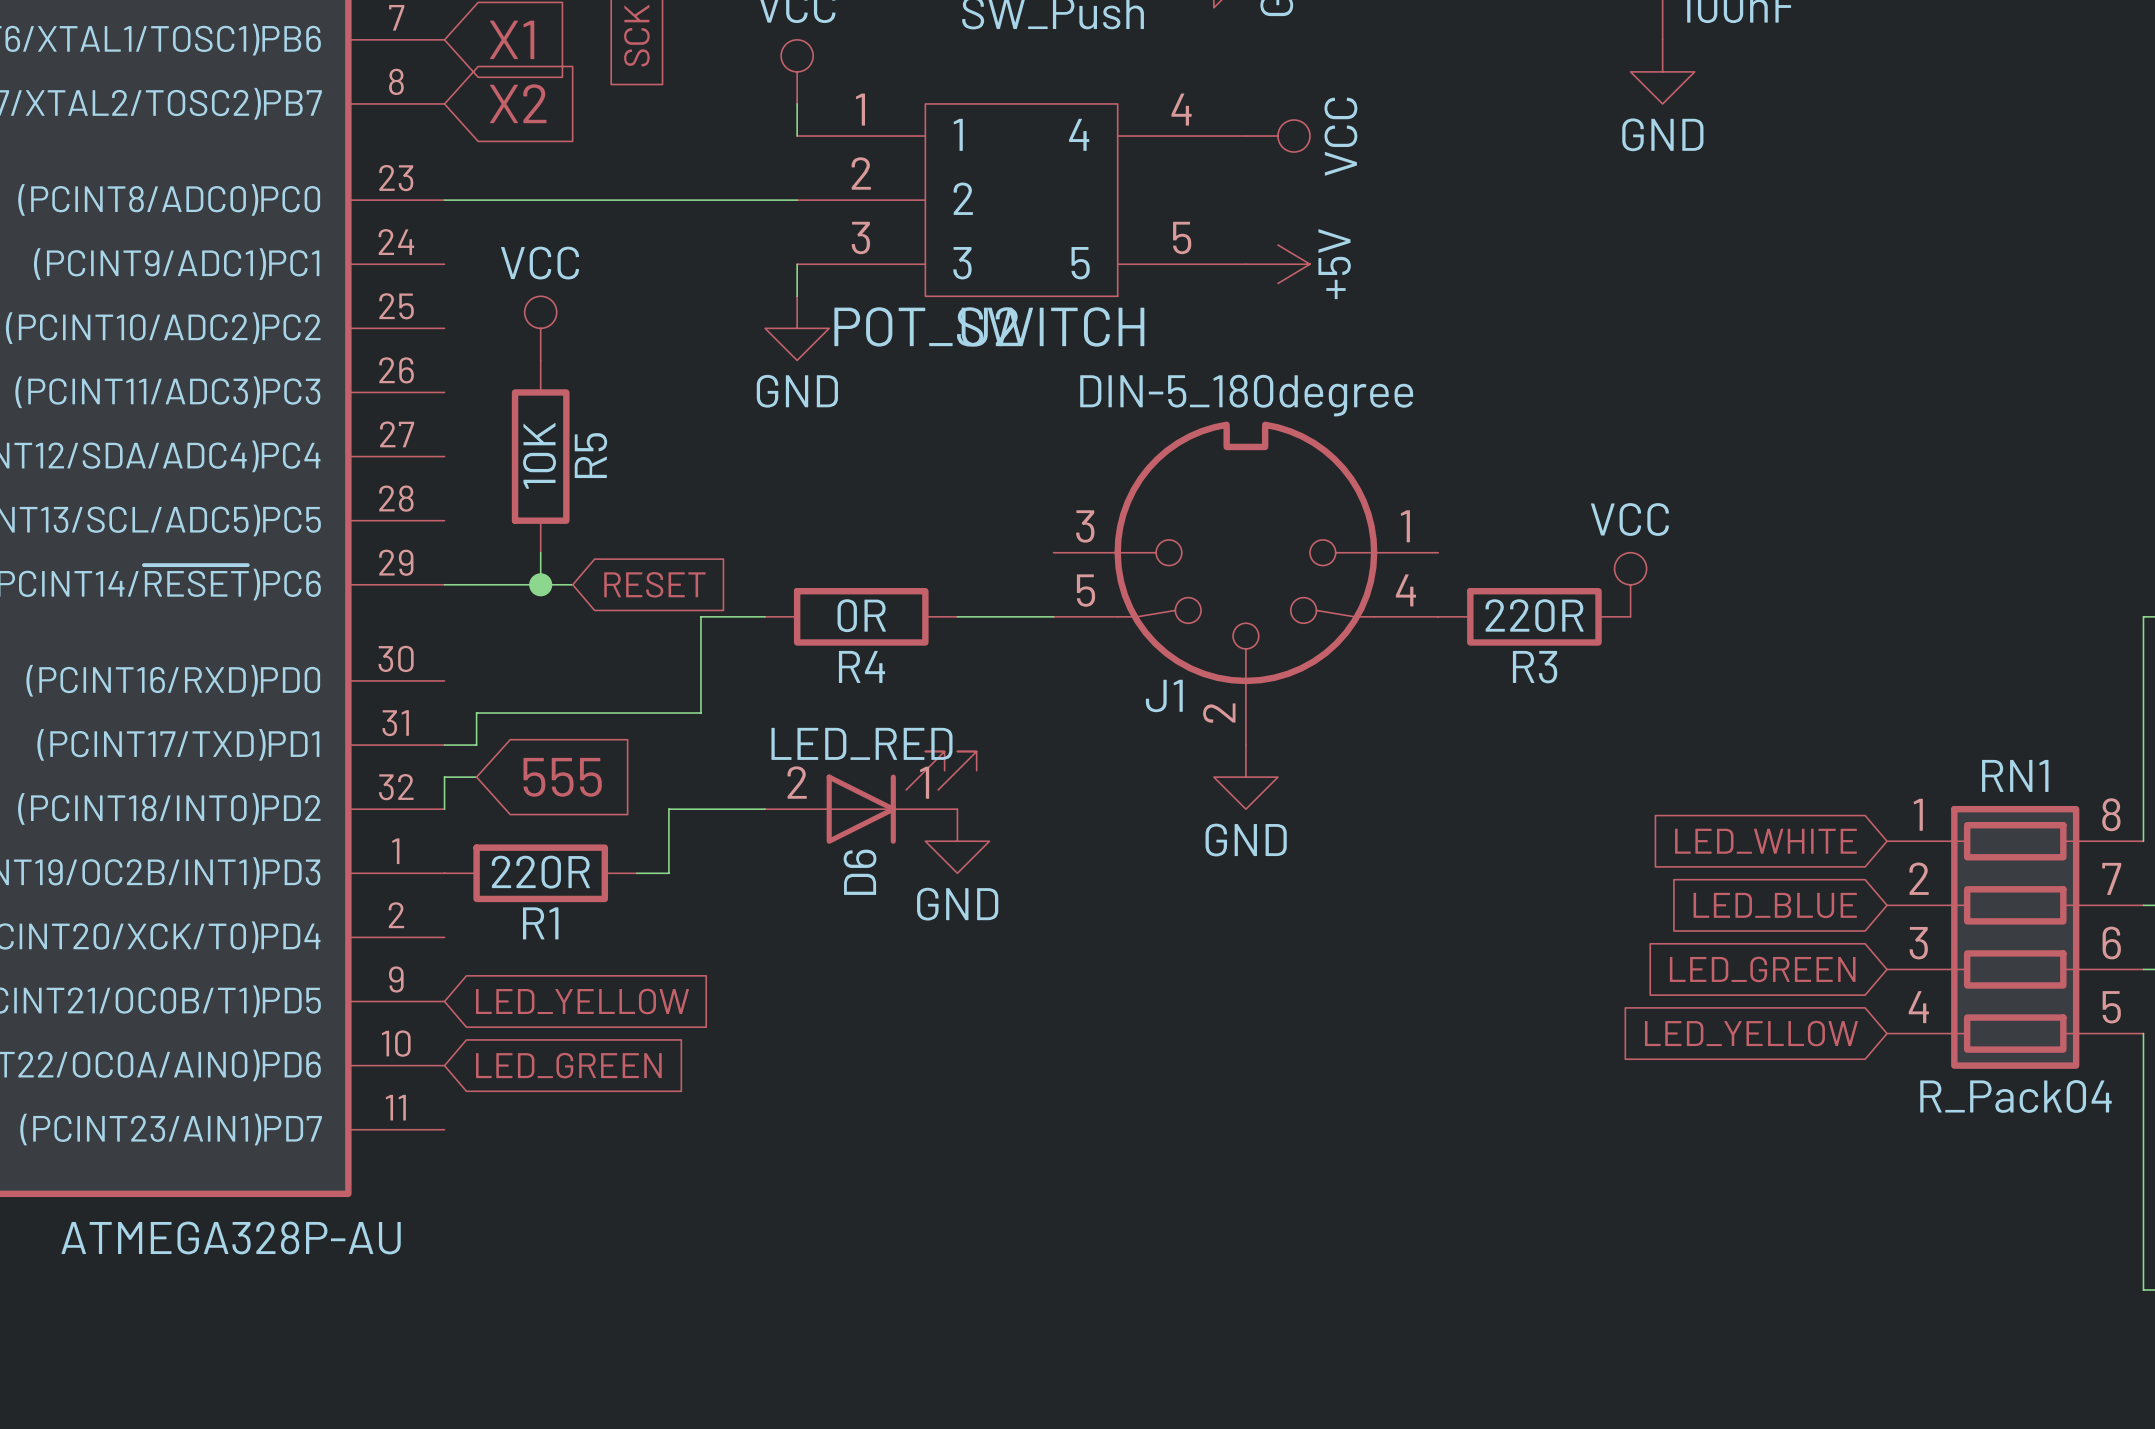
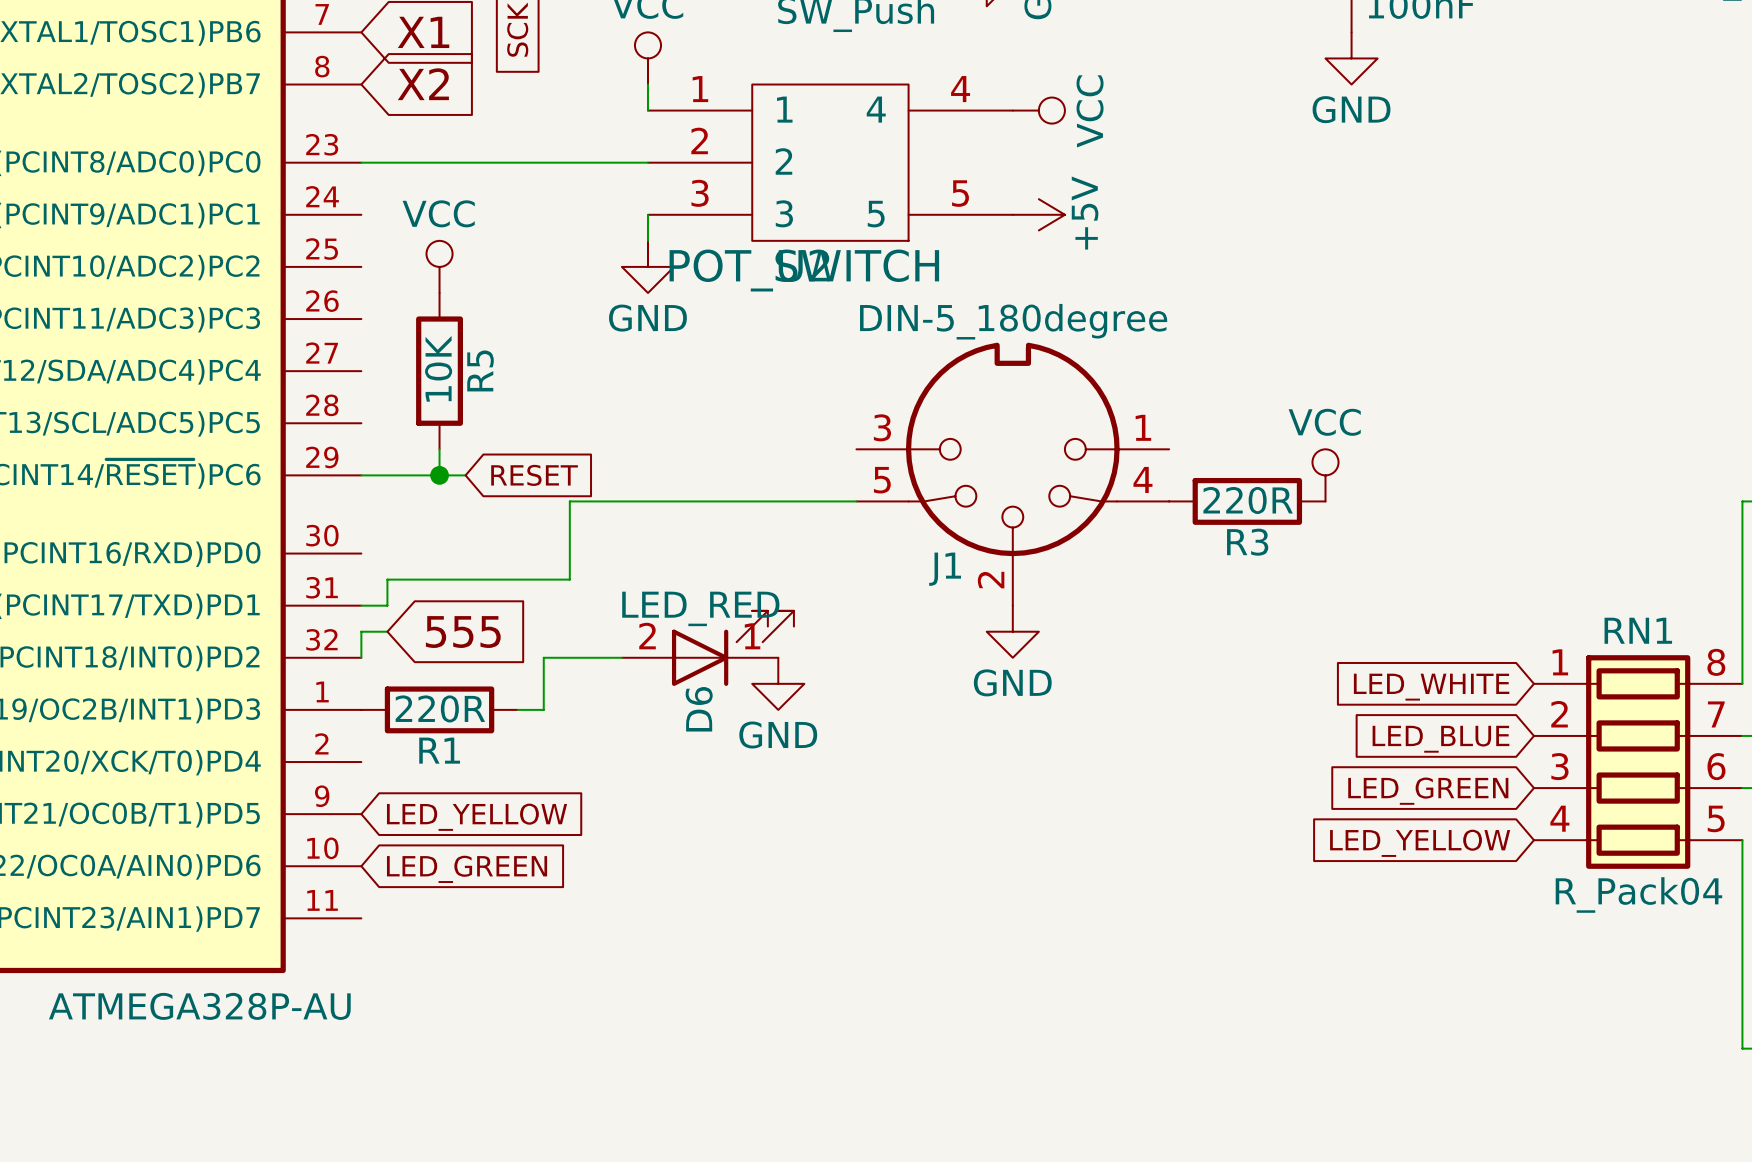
wire: none -> (621, 501) (778, 501)
R4: 0R (861, 616) -> none

